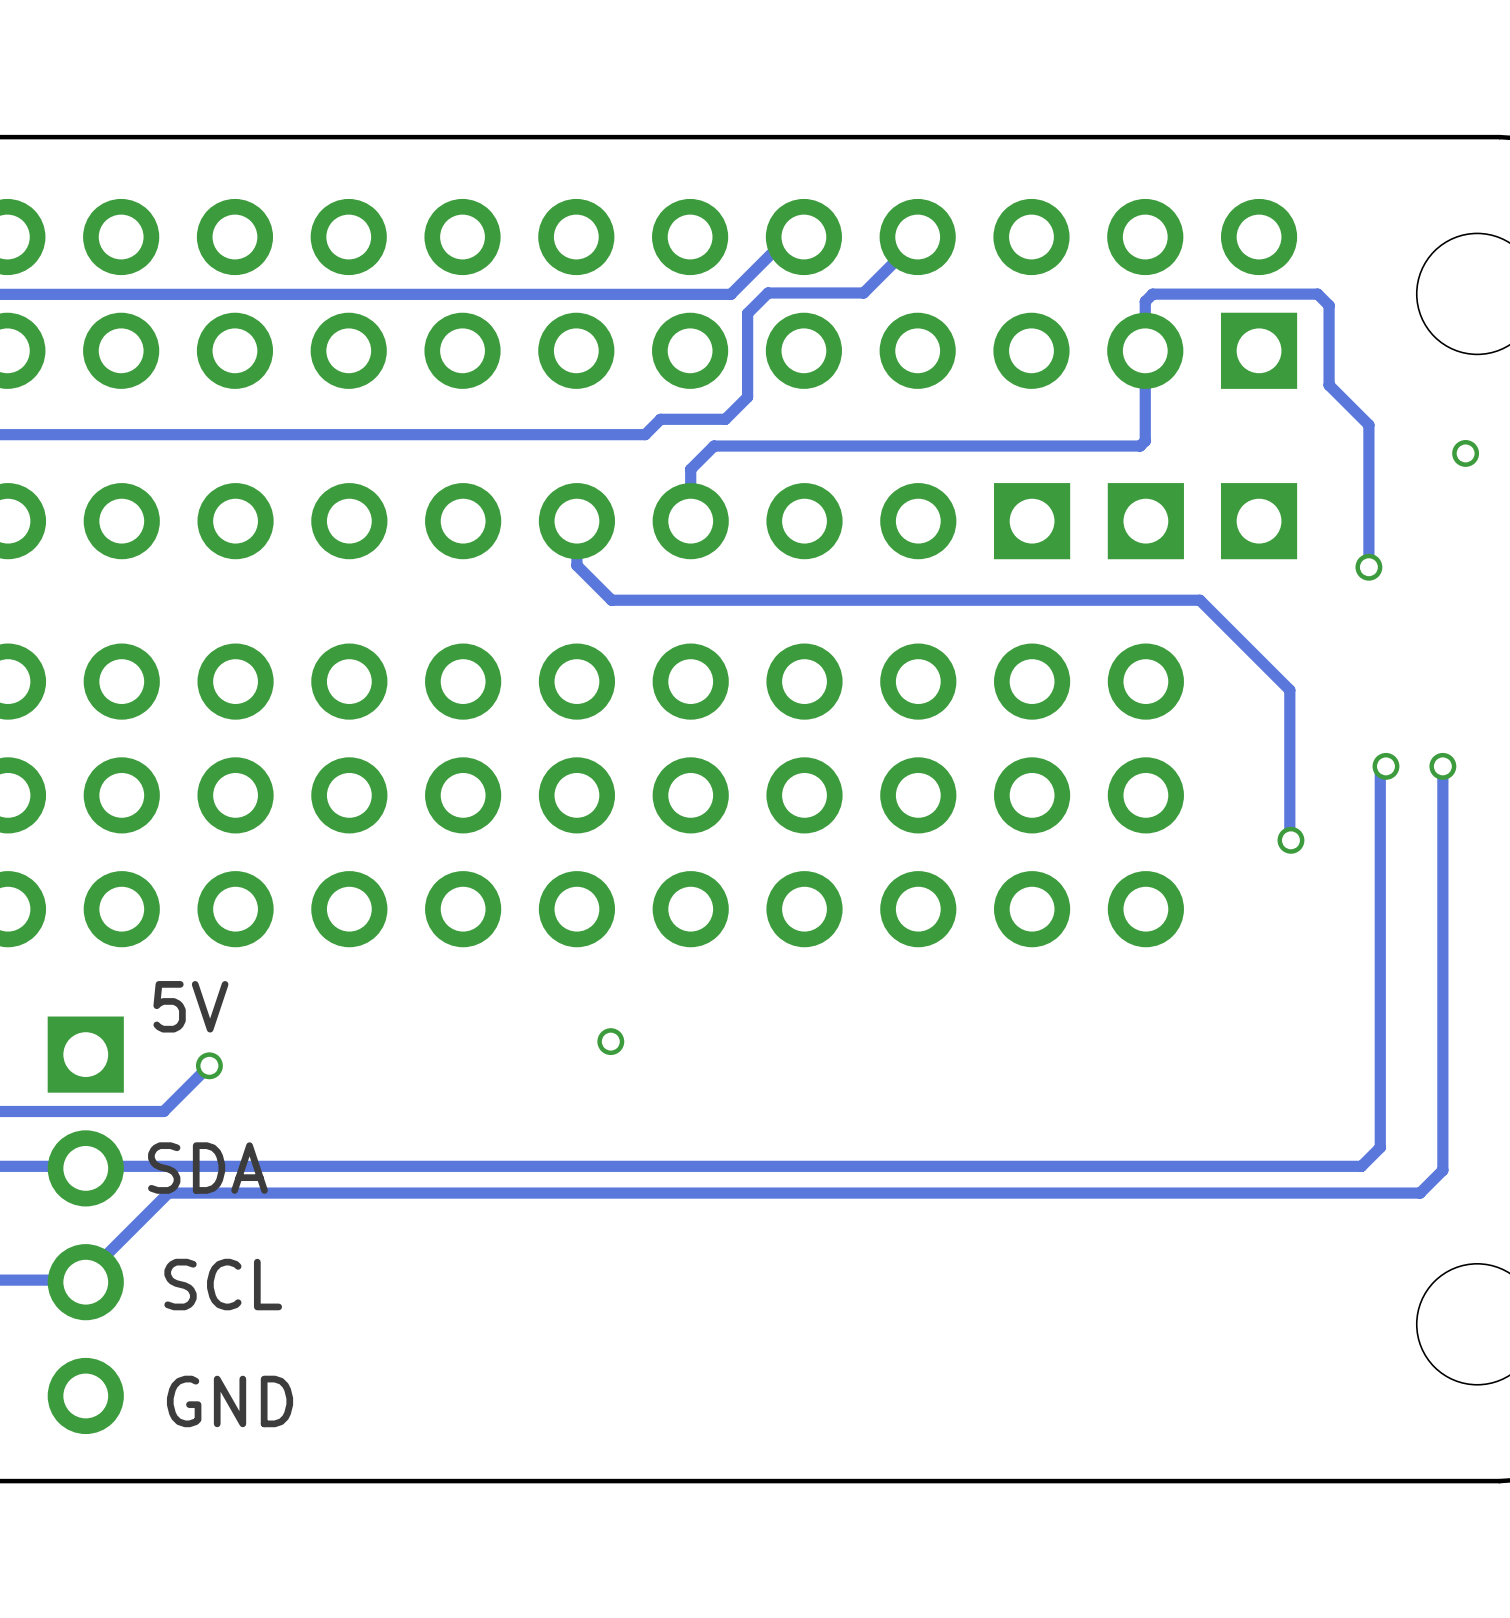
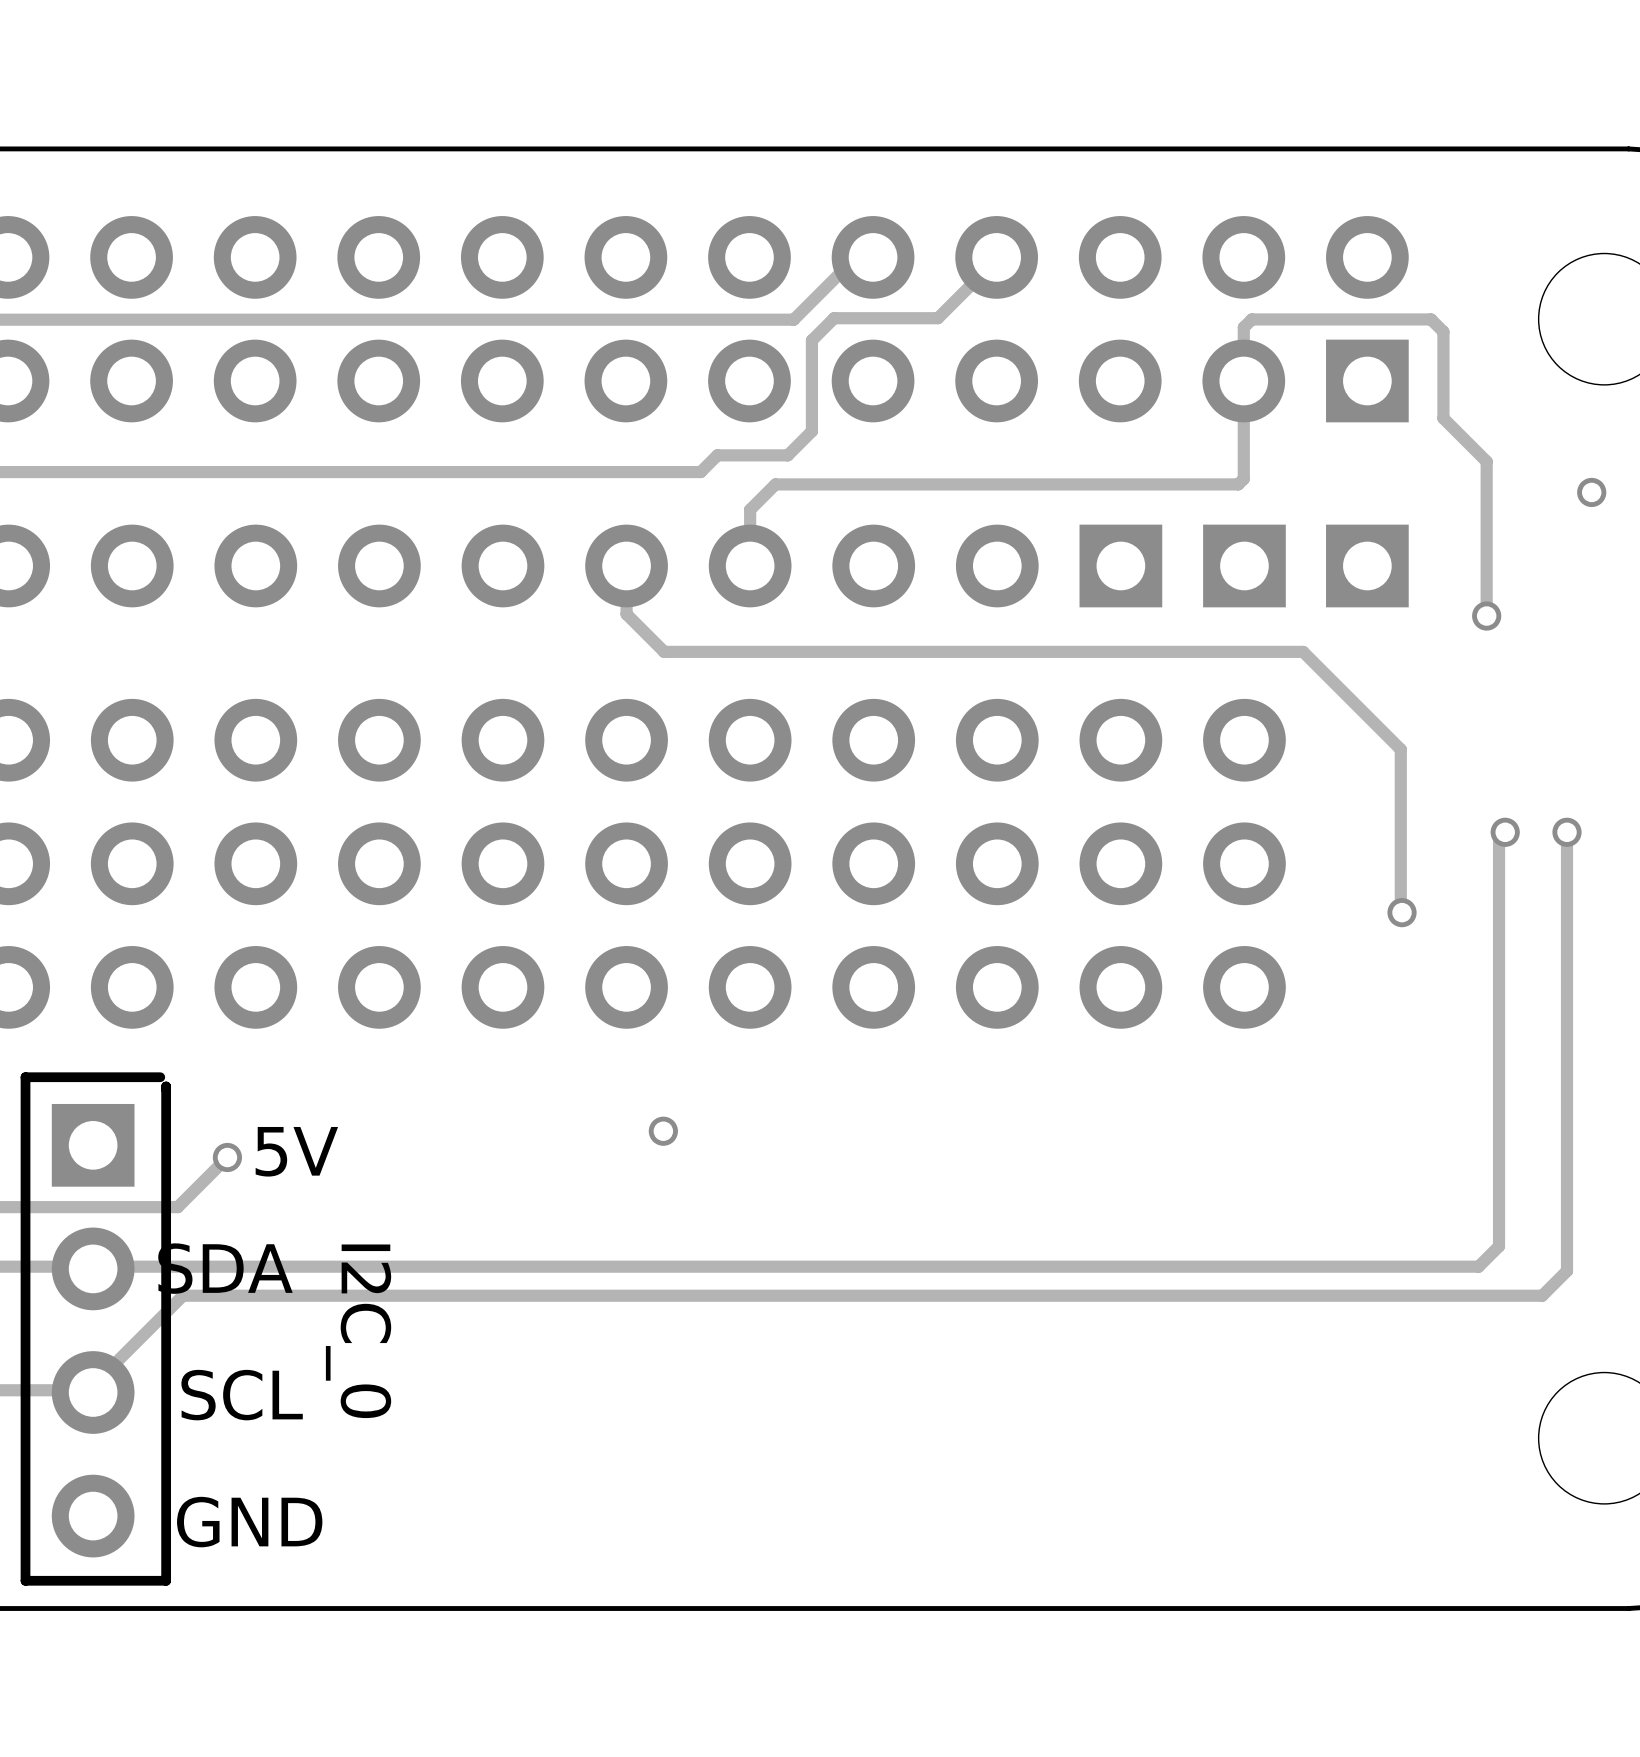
line: none -> (160, 1077) (25, 1077) (25, 1580) (166, 1580) (166, 1086)
text position: 5V (190, 1006) -> 5V (296, 1151)
text: none -> I2C_0 (358, 1331)

